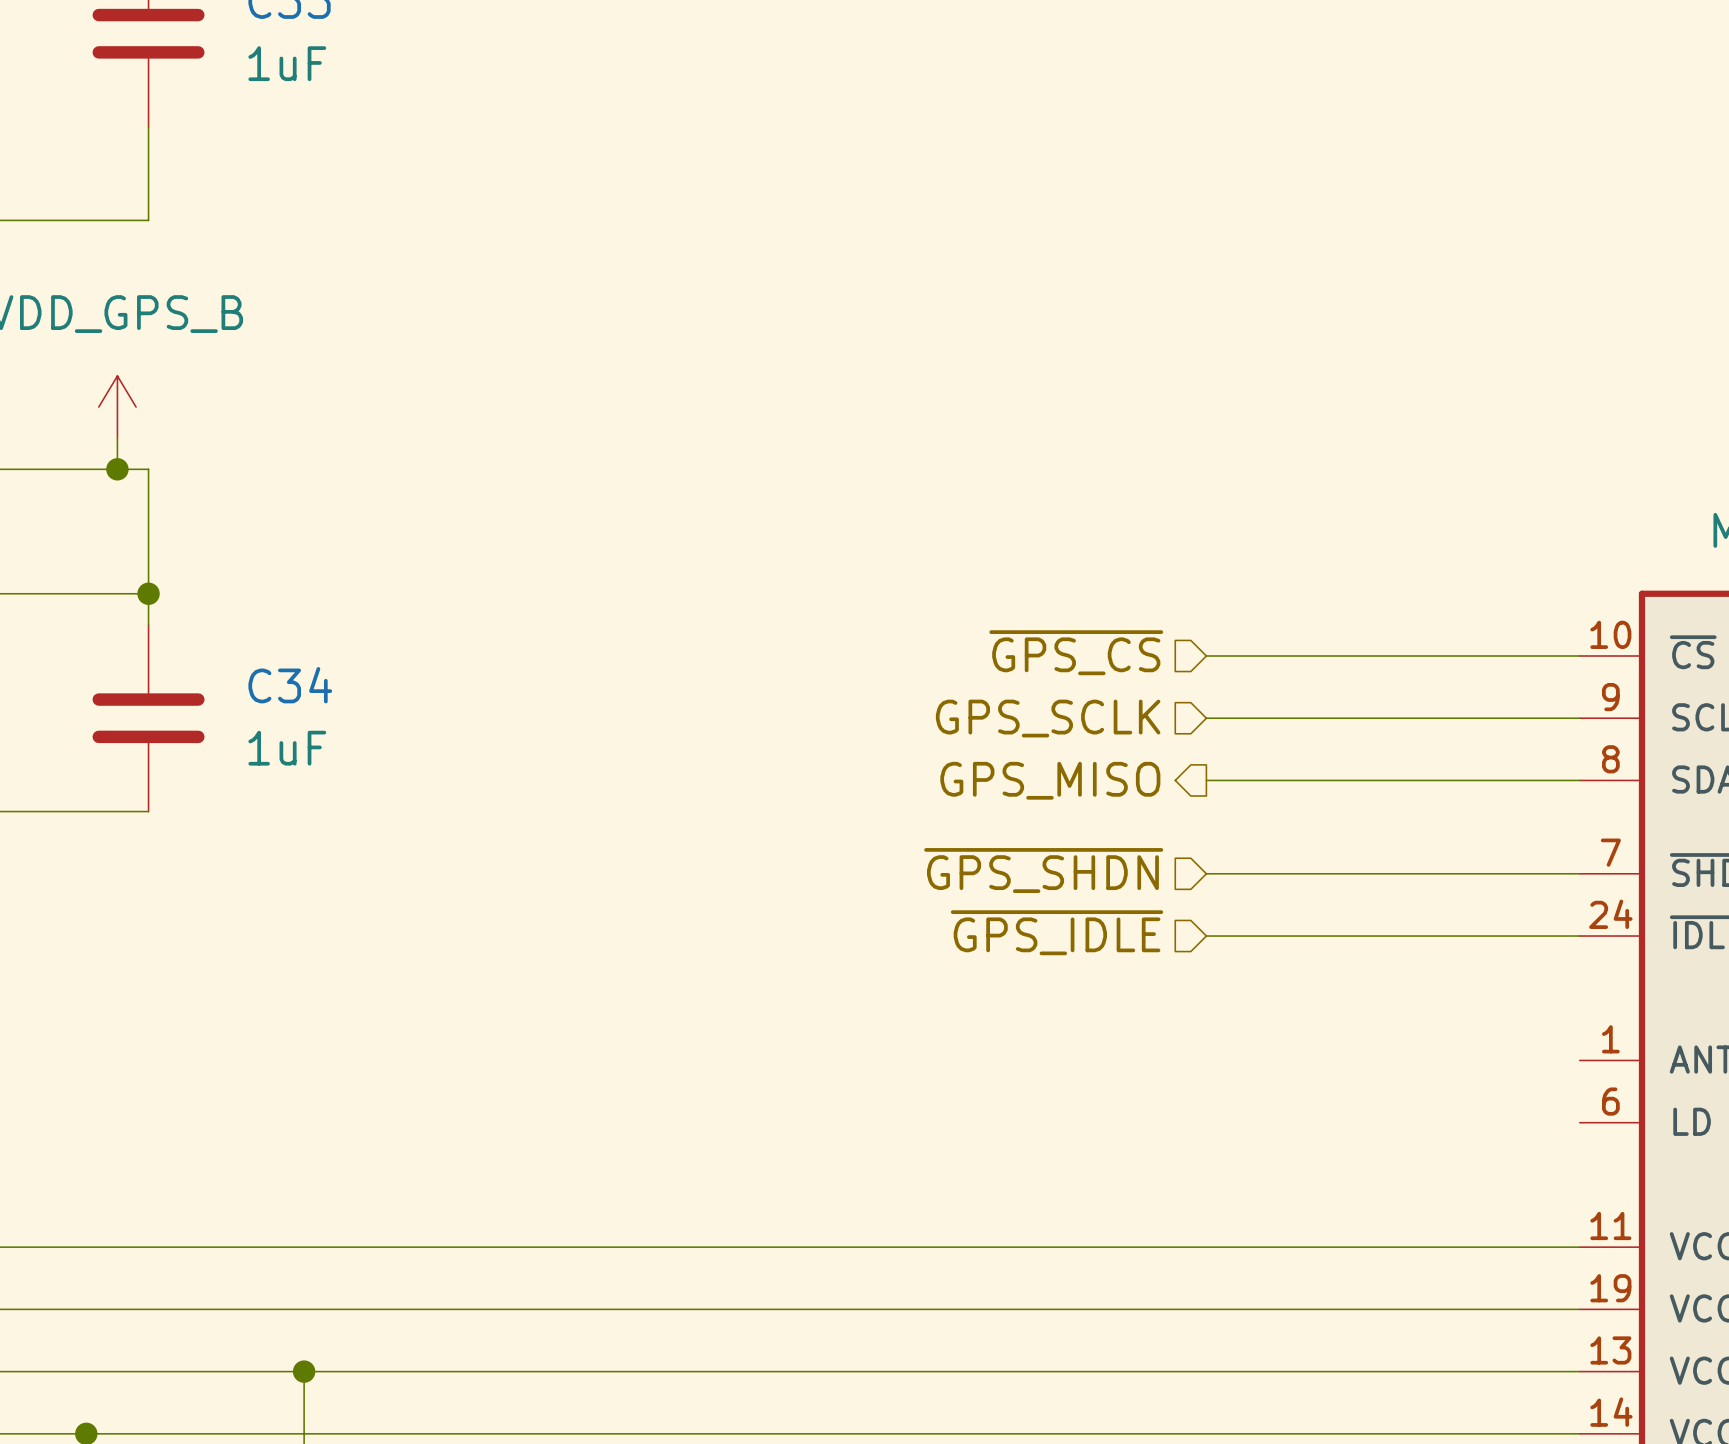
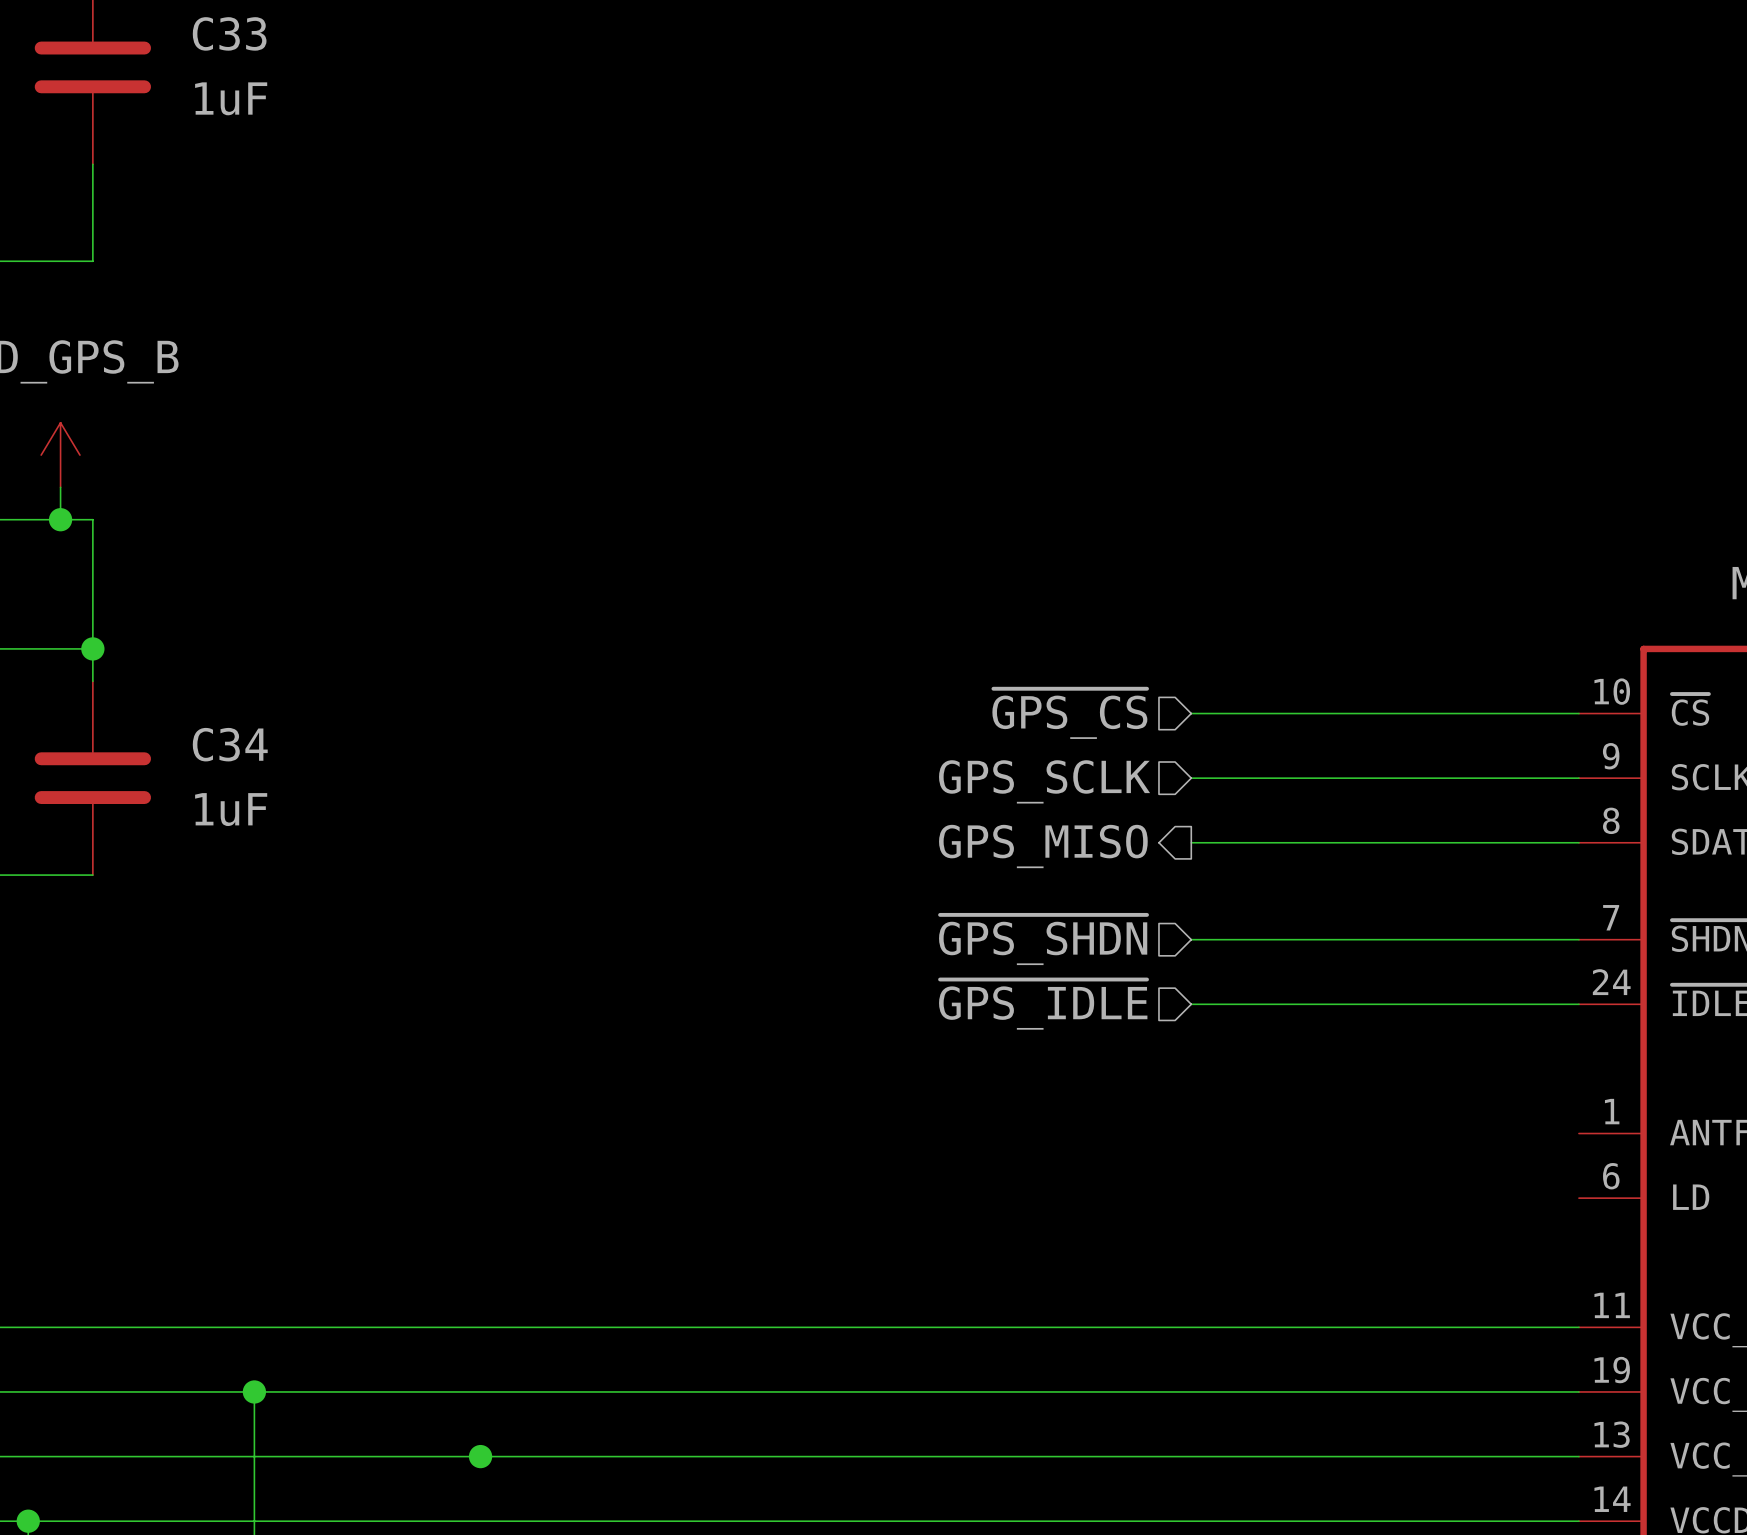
wire: none -> (254, 1391) (254, 1456)
junction position: (304, 1371) -> (254, 1391)
junction: none -> (480, 1456)

